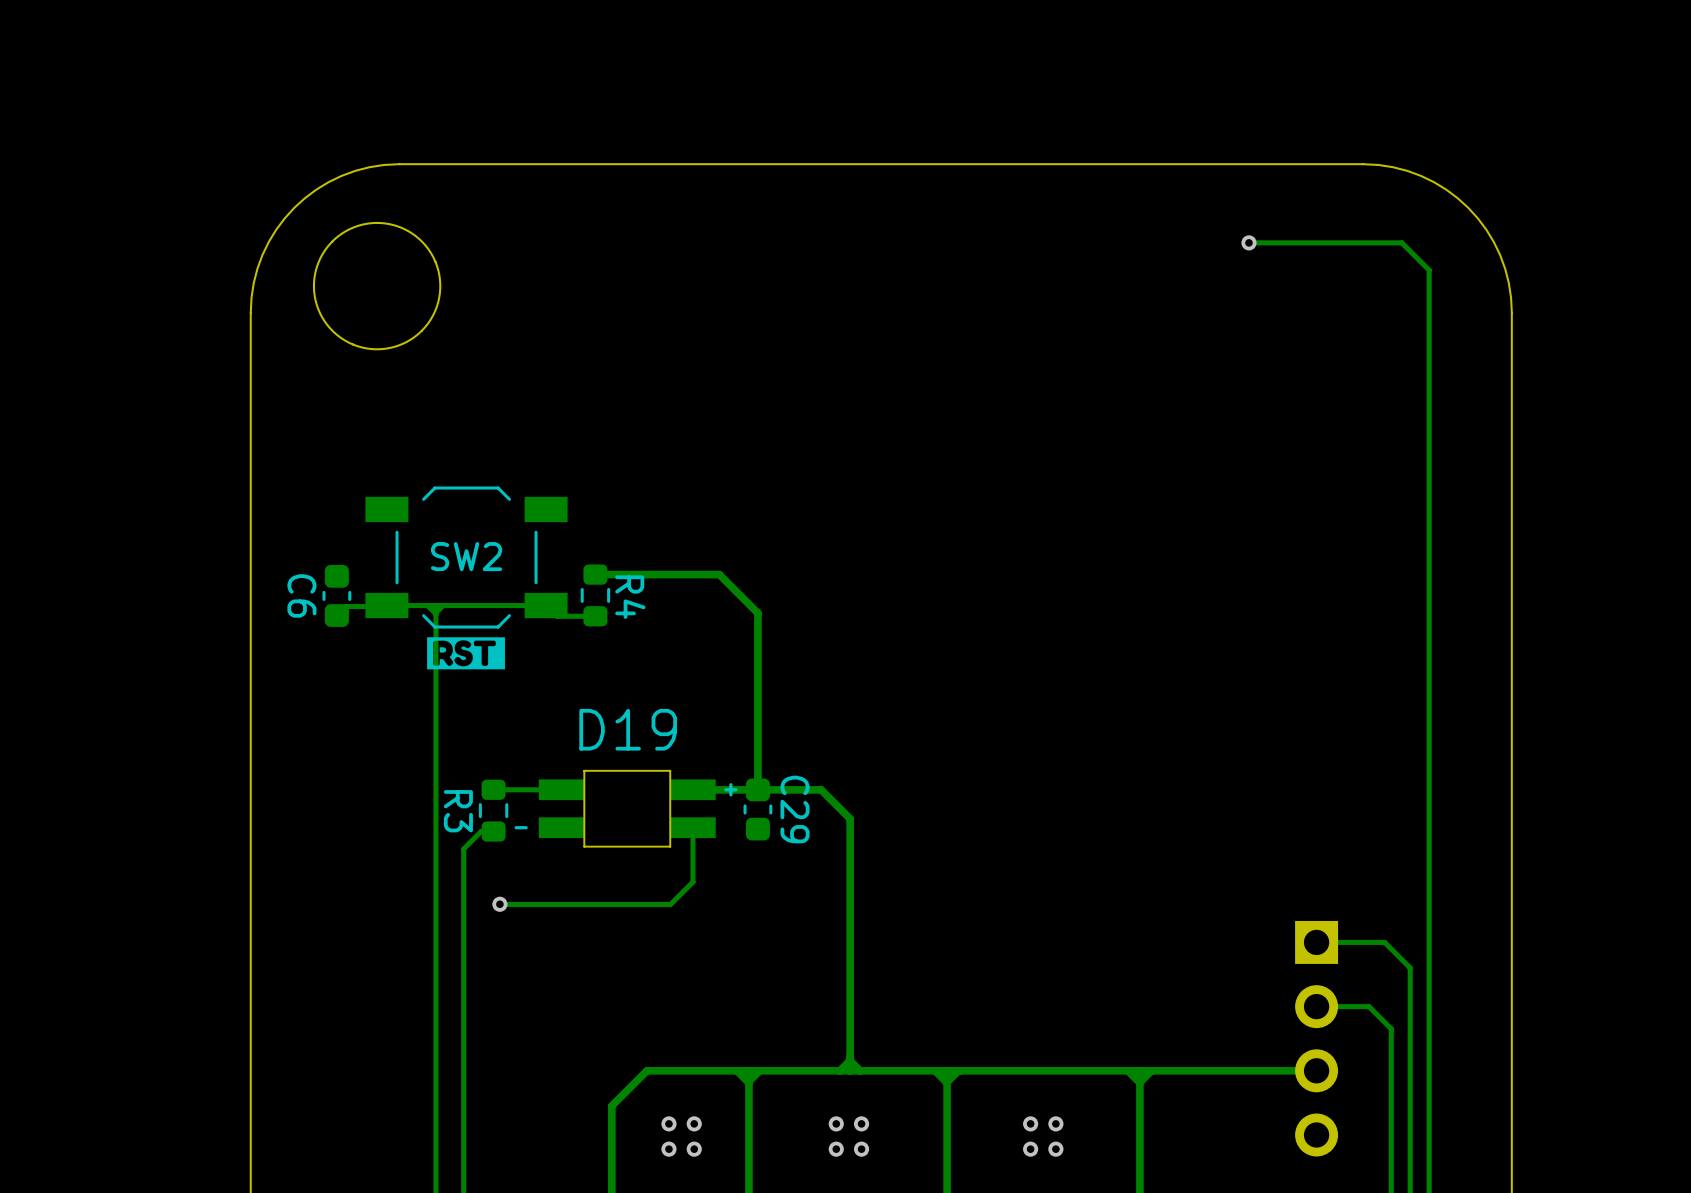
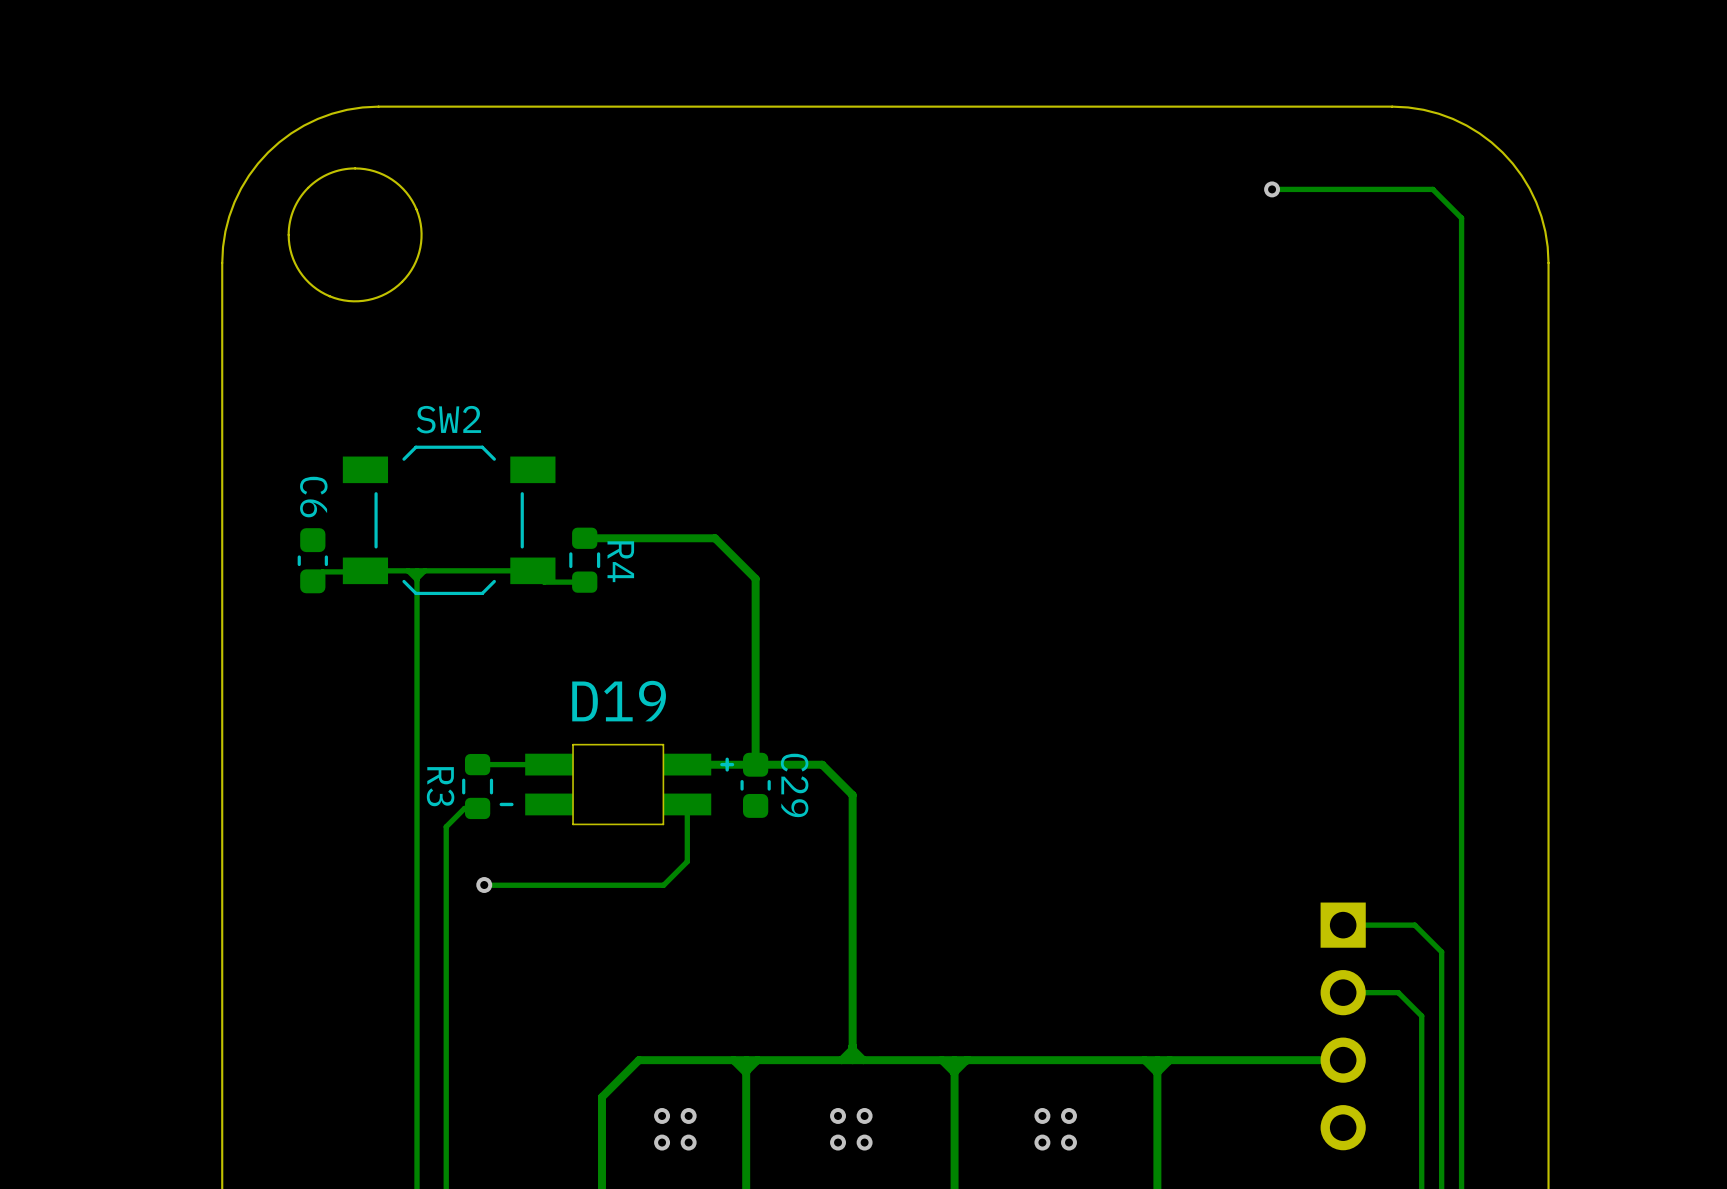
SW2 name position: SW2 (466, 556) -> SW2 (448, 419)
C6 name position: C6 (301, 595) -> C6 (313, 497)
drawing: [427, 637, 505, 670] -> none

